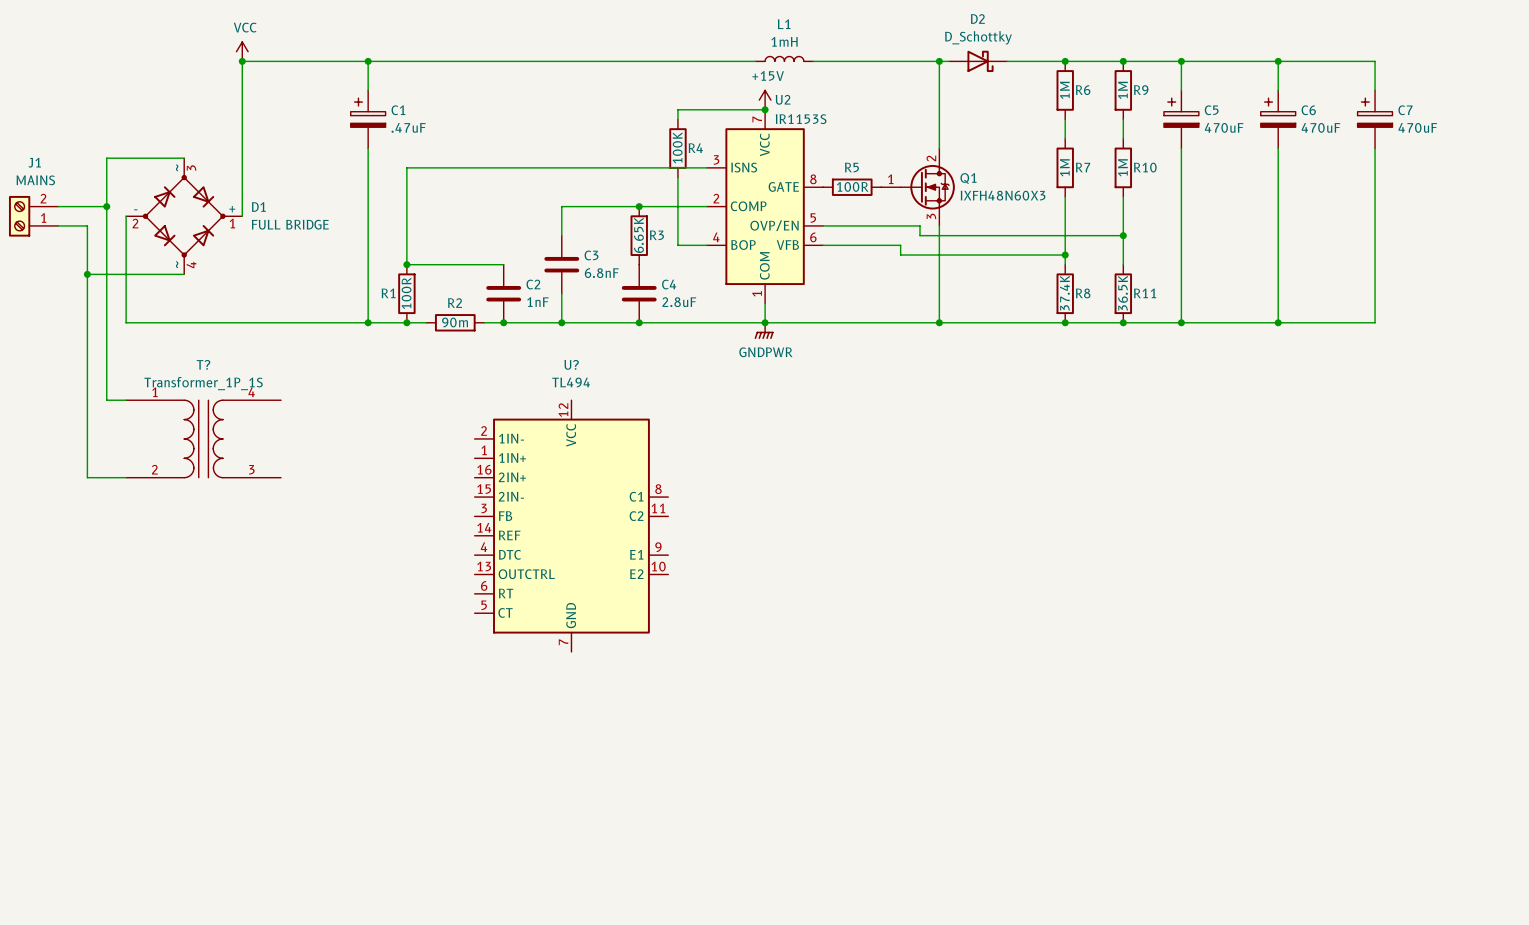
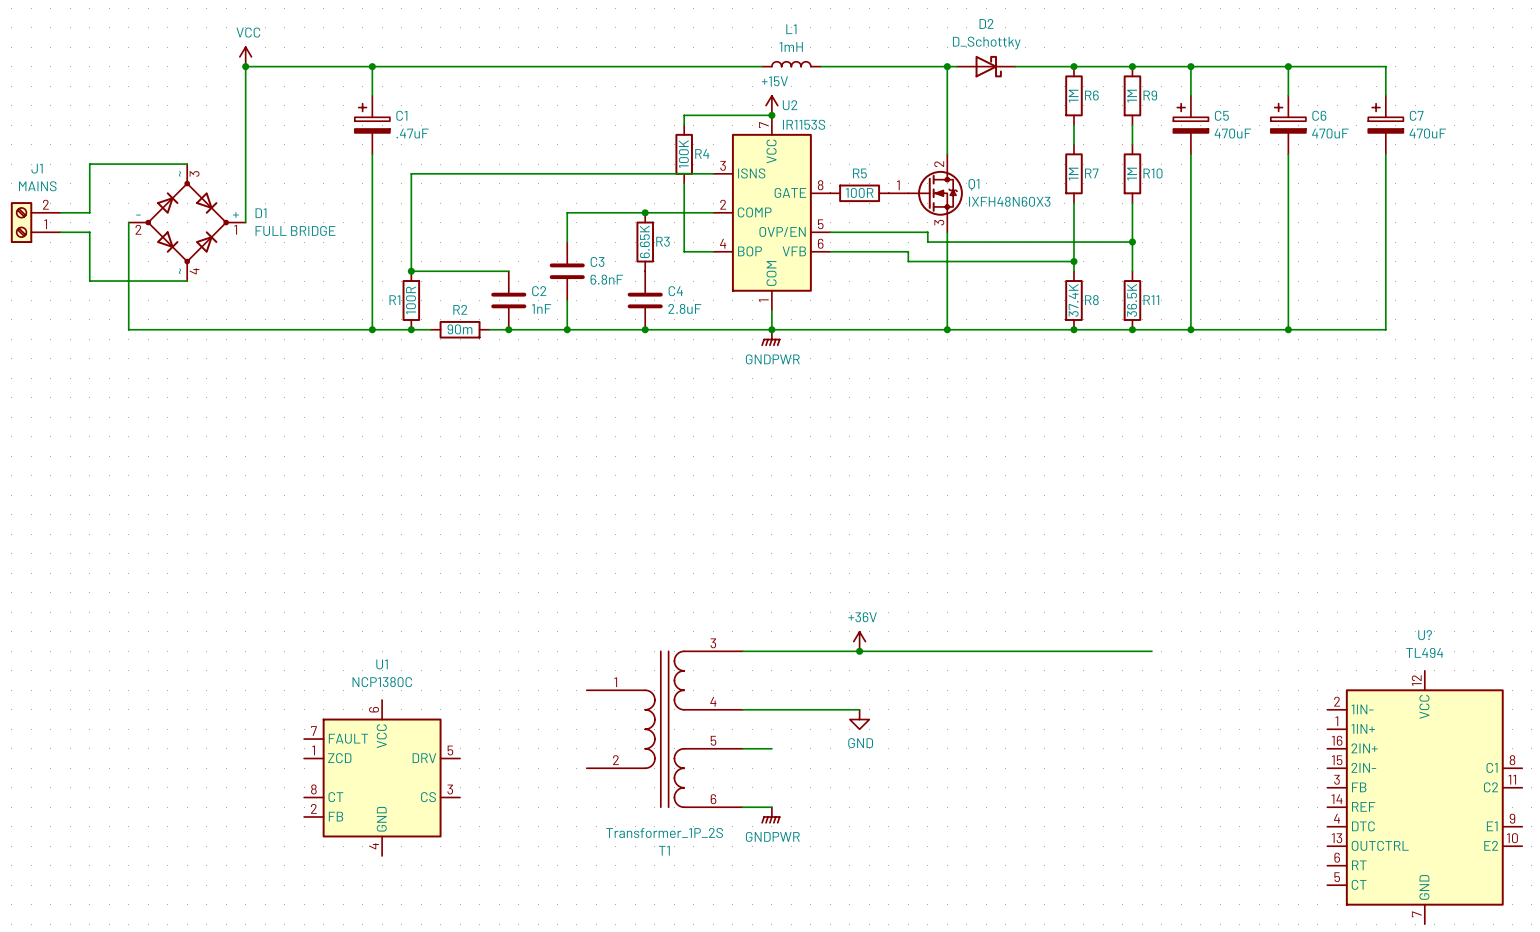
wire: (106, 158) (106, 400) (126, 400) -> none
wire: (87, 206) (106, 206) -> (89, 212) (89, 164) (109, 164)
junction: (106, 206) -> none
wire: (87, 274) (87, 477) (126, 477) -> none
junction: (87, 274) -> none
T?: Transformer_1P_1S (203, 438) -> none
U?: TL494 (571, 526) -> none
power symbol: none -> +36V (859, 641)
wire: none -> (742, 651) (1151, 651)
junction: none -> (859, 651)
wire: none -> (742, 709) (859, 709)
power symbol: none -> GND (859, 719)
T1: none -> Transformer_1P_2S (664, 729)
wire: none -> (742, 748) (771, 748)
U1: none -> NCP1380C (382, 778)
U?: none -> TL494 (1424, 797)
wire: none -> (742, 807) (771, 807)
power symbol: none -> GNDPWR (770, 815)

